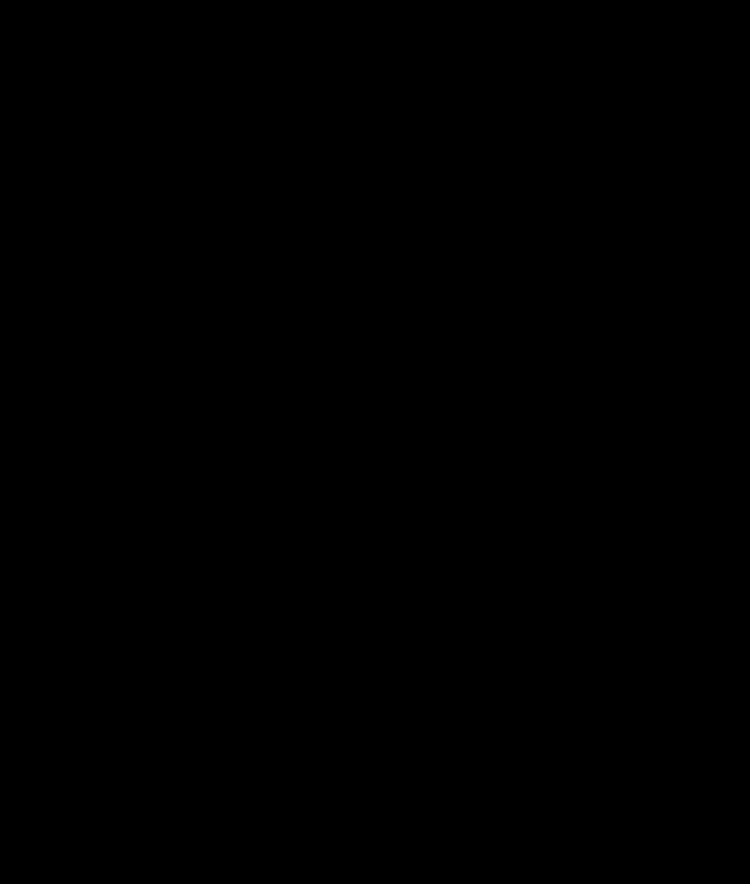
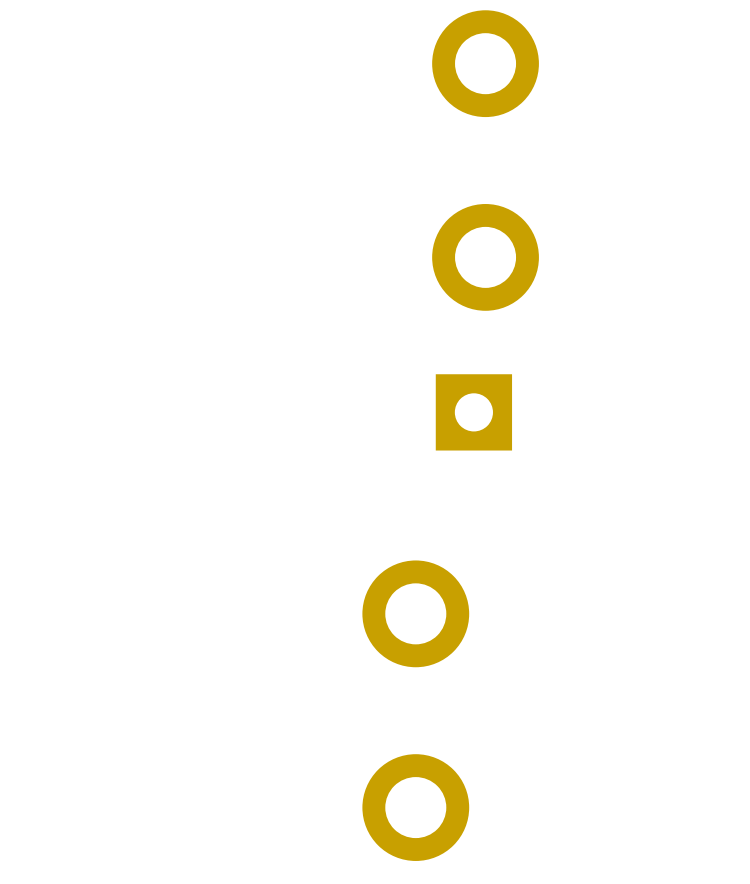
part: none -> (485, 160)
part: none -> (473, 412)
part: none -> (415, 710)

